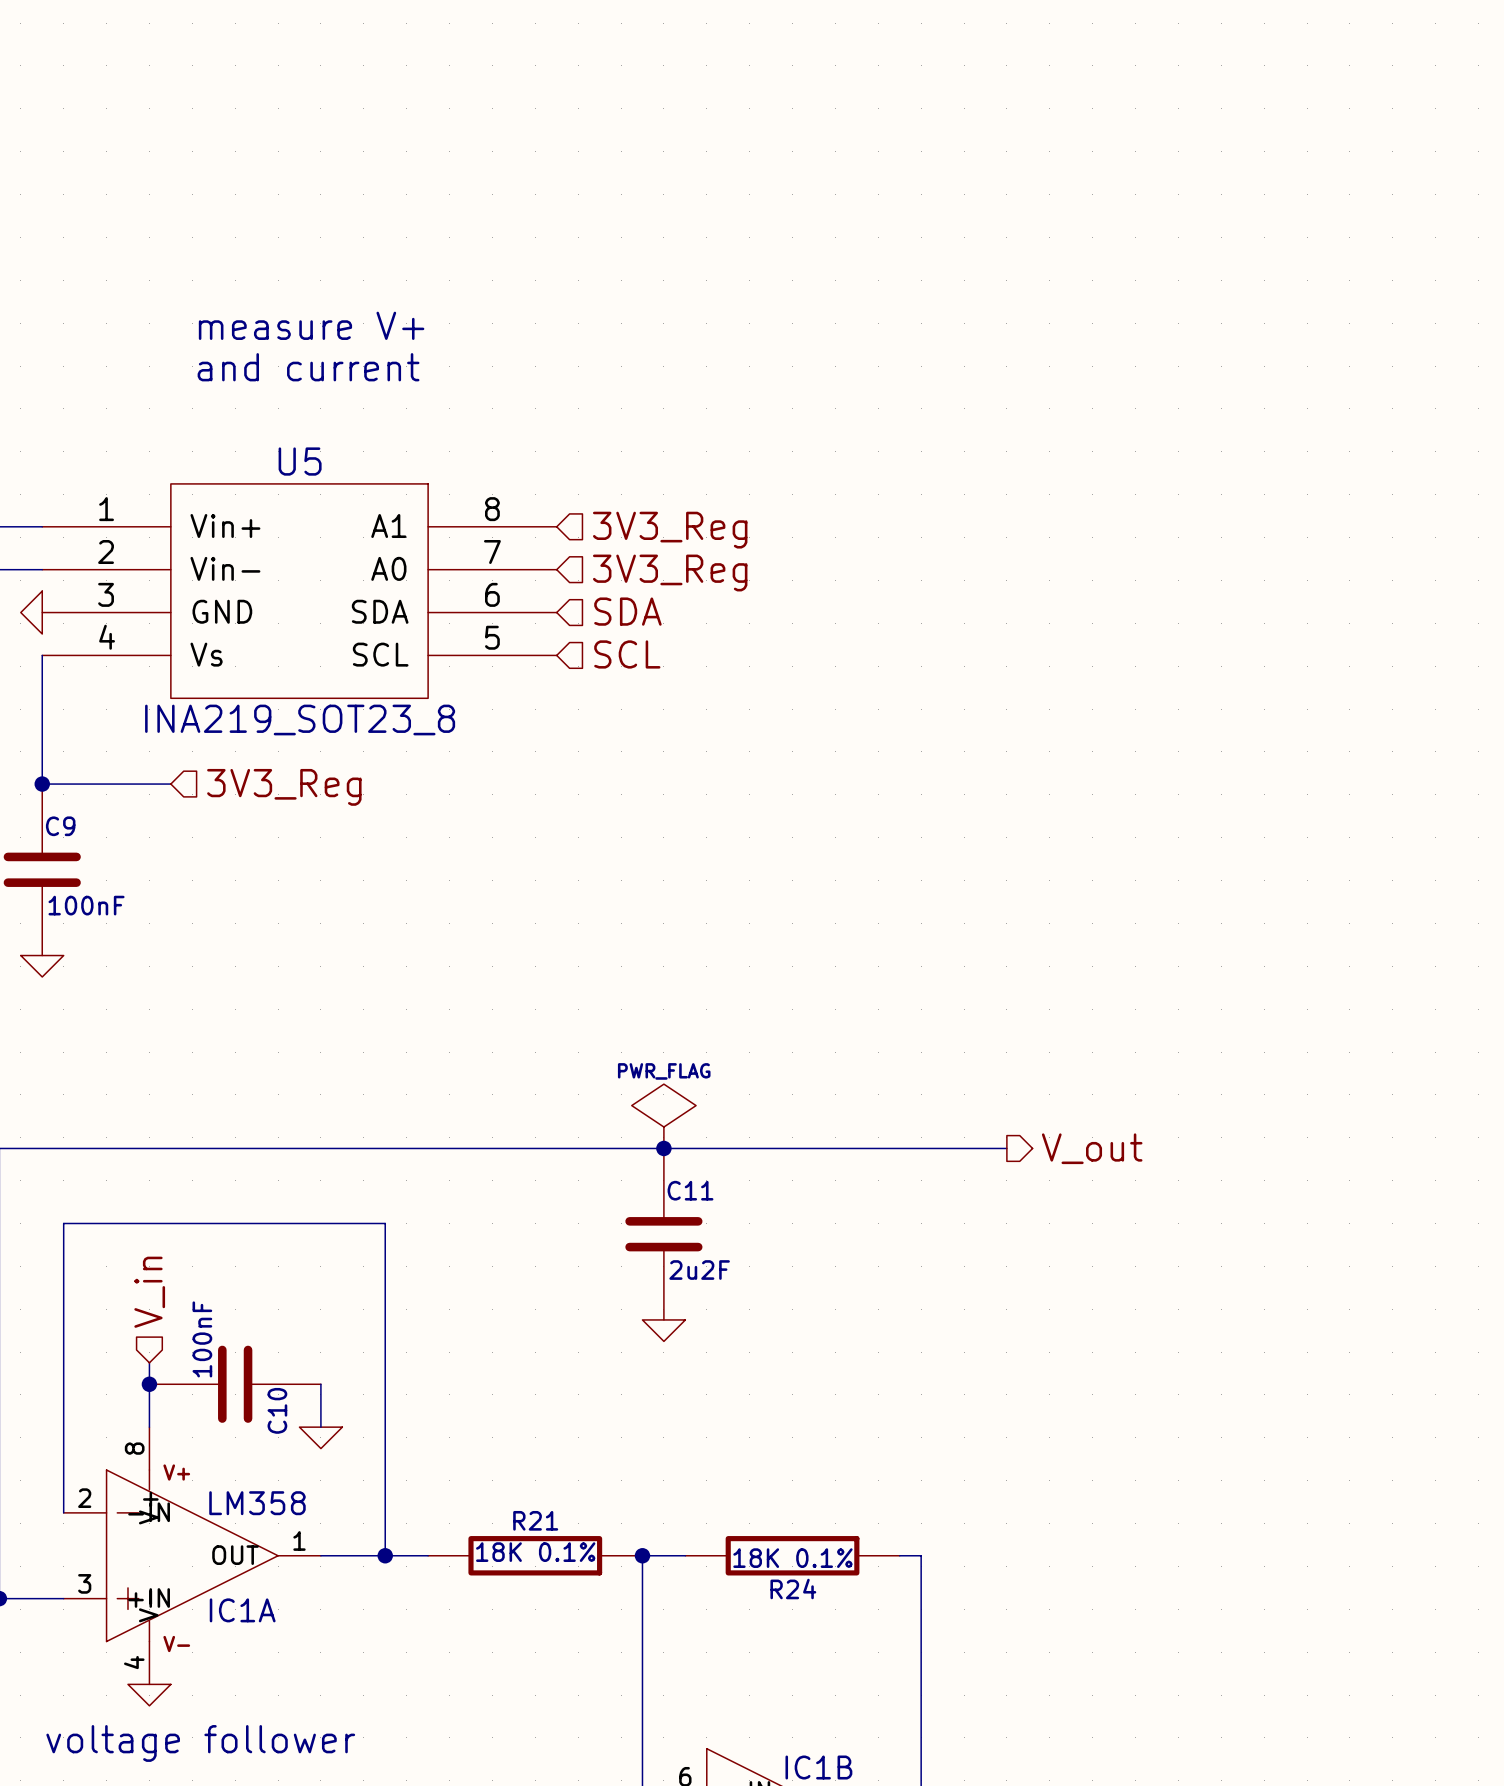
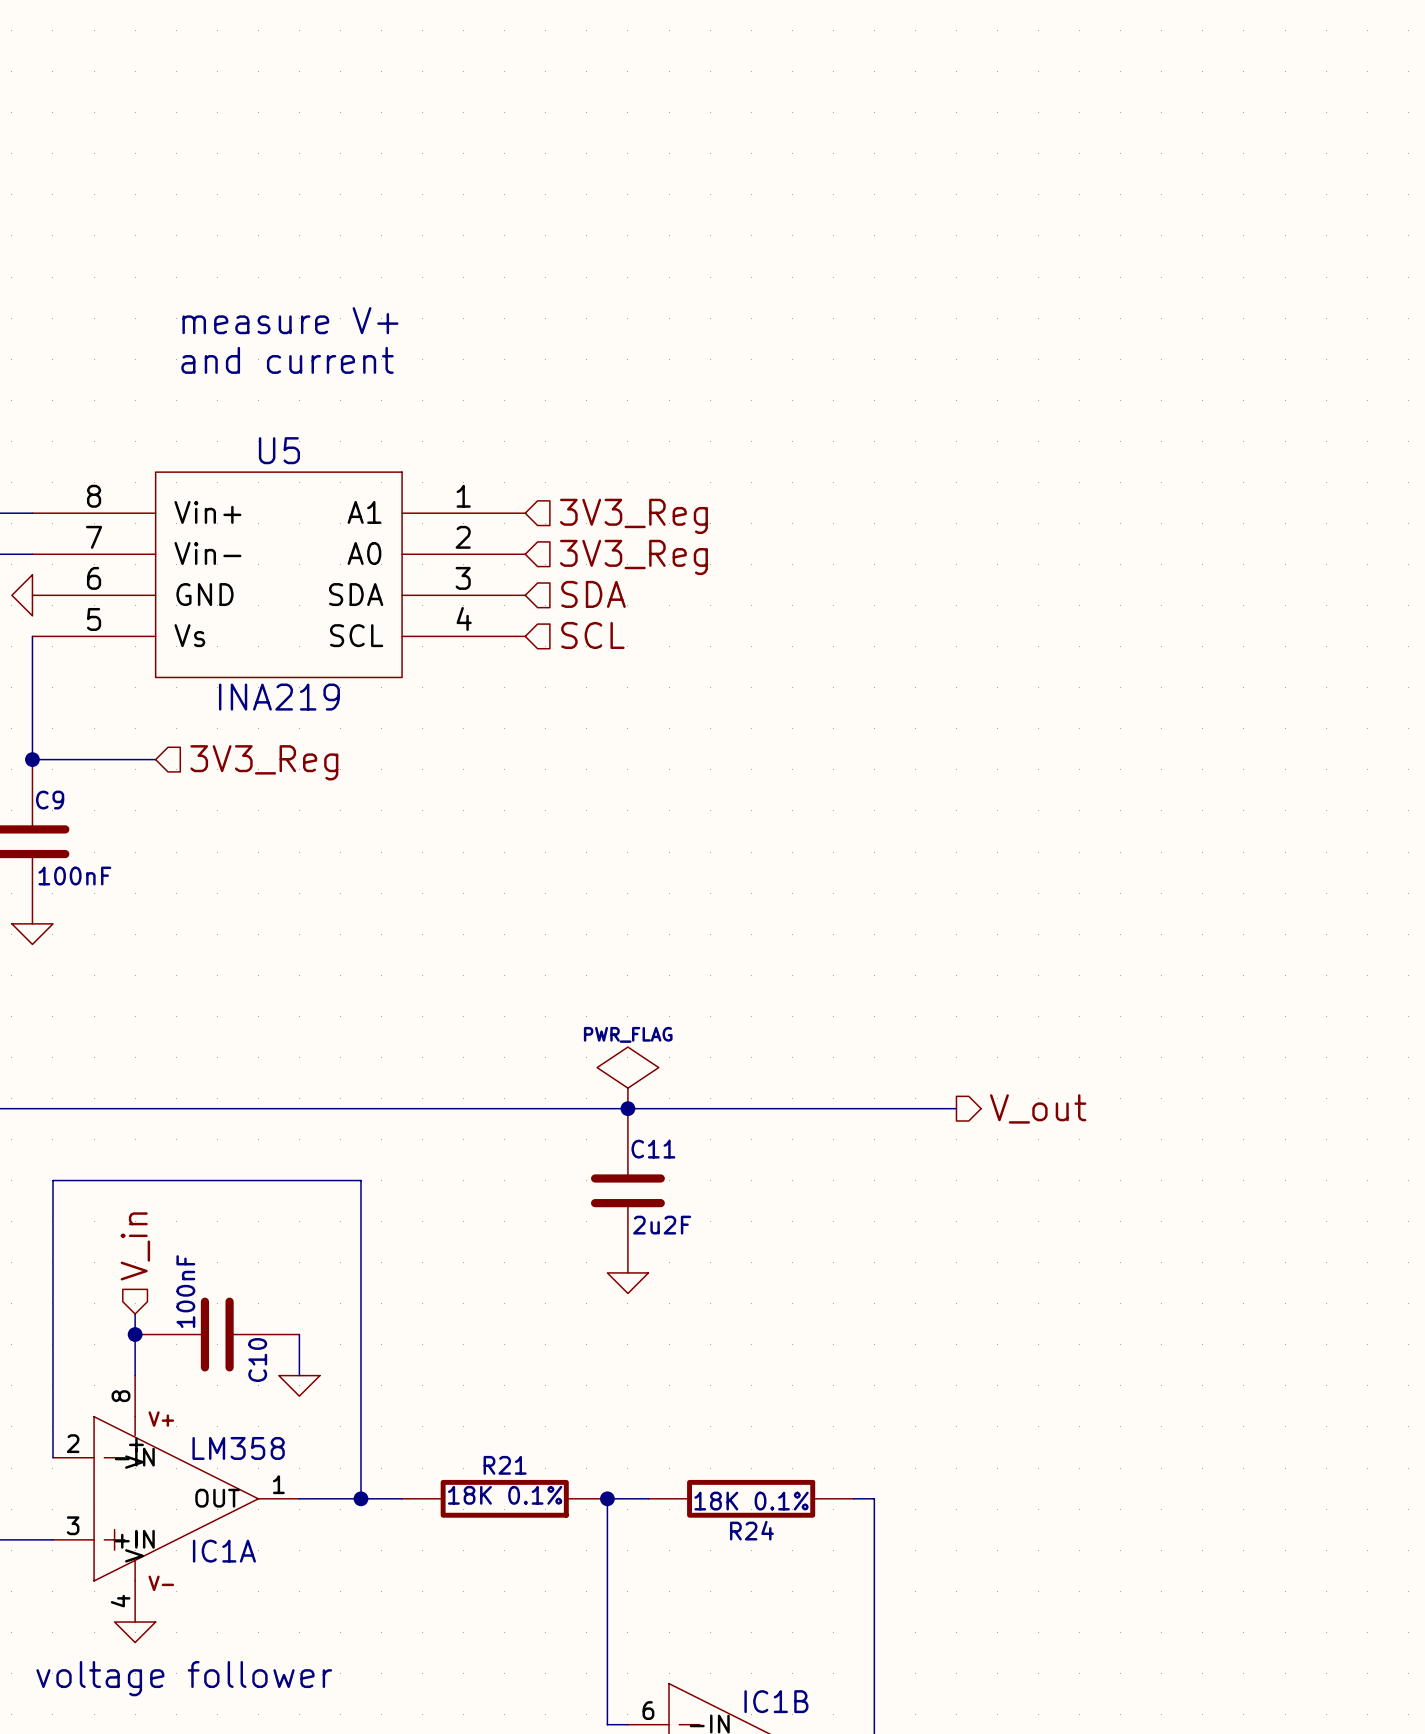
U5 pin number: 1 (106, 509) -> 8 (94, 496)
U5 pin number: 8 (492, 509) -> 1 (463, 496)
U5 pin number: 2 (106, 551) -> 7 (94, 537)
U5 pin number: 7 (492, 551) -> 2 (463, 537)
U5 pin number: 3 (106, 594) -> 6 (94, 578)
U5 pin number: 6 (492, 594) -> 3 (463, 578)
U5 pin number: 4 (107, 637) -> 5 (94, 619)
U5 pin number: 5 (492, 637) -> 4 (464, 618)
U5 value: INA219_SOT23_8 (300, 720) -> INA219 (279, 697)

